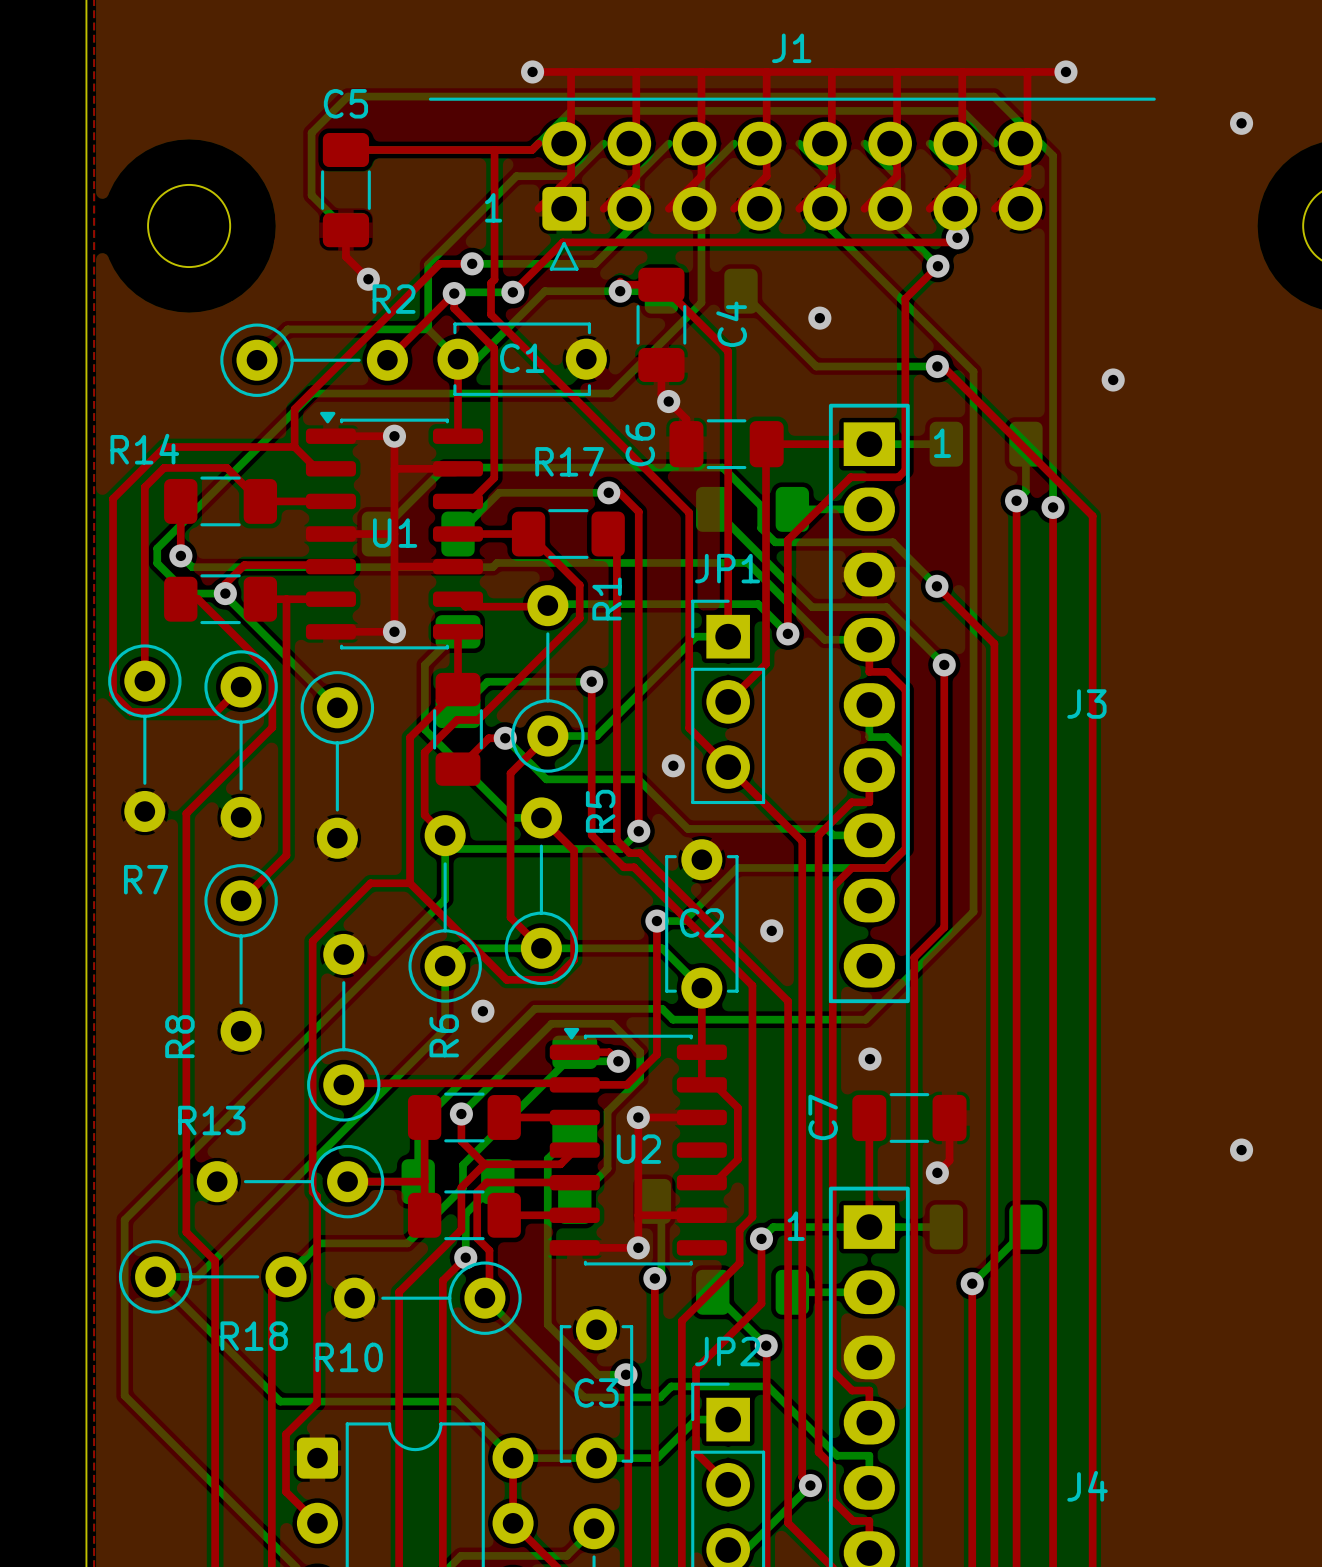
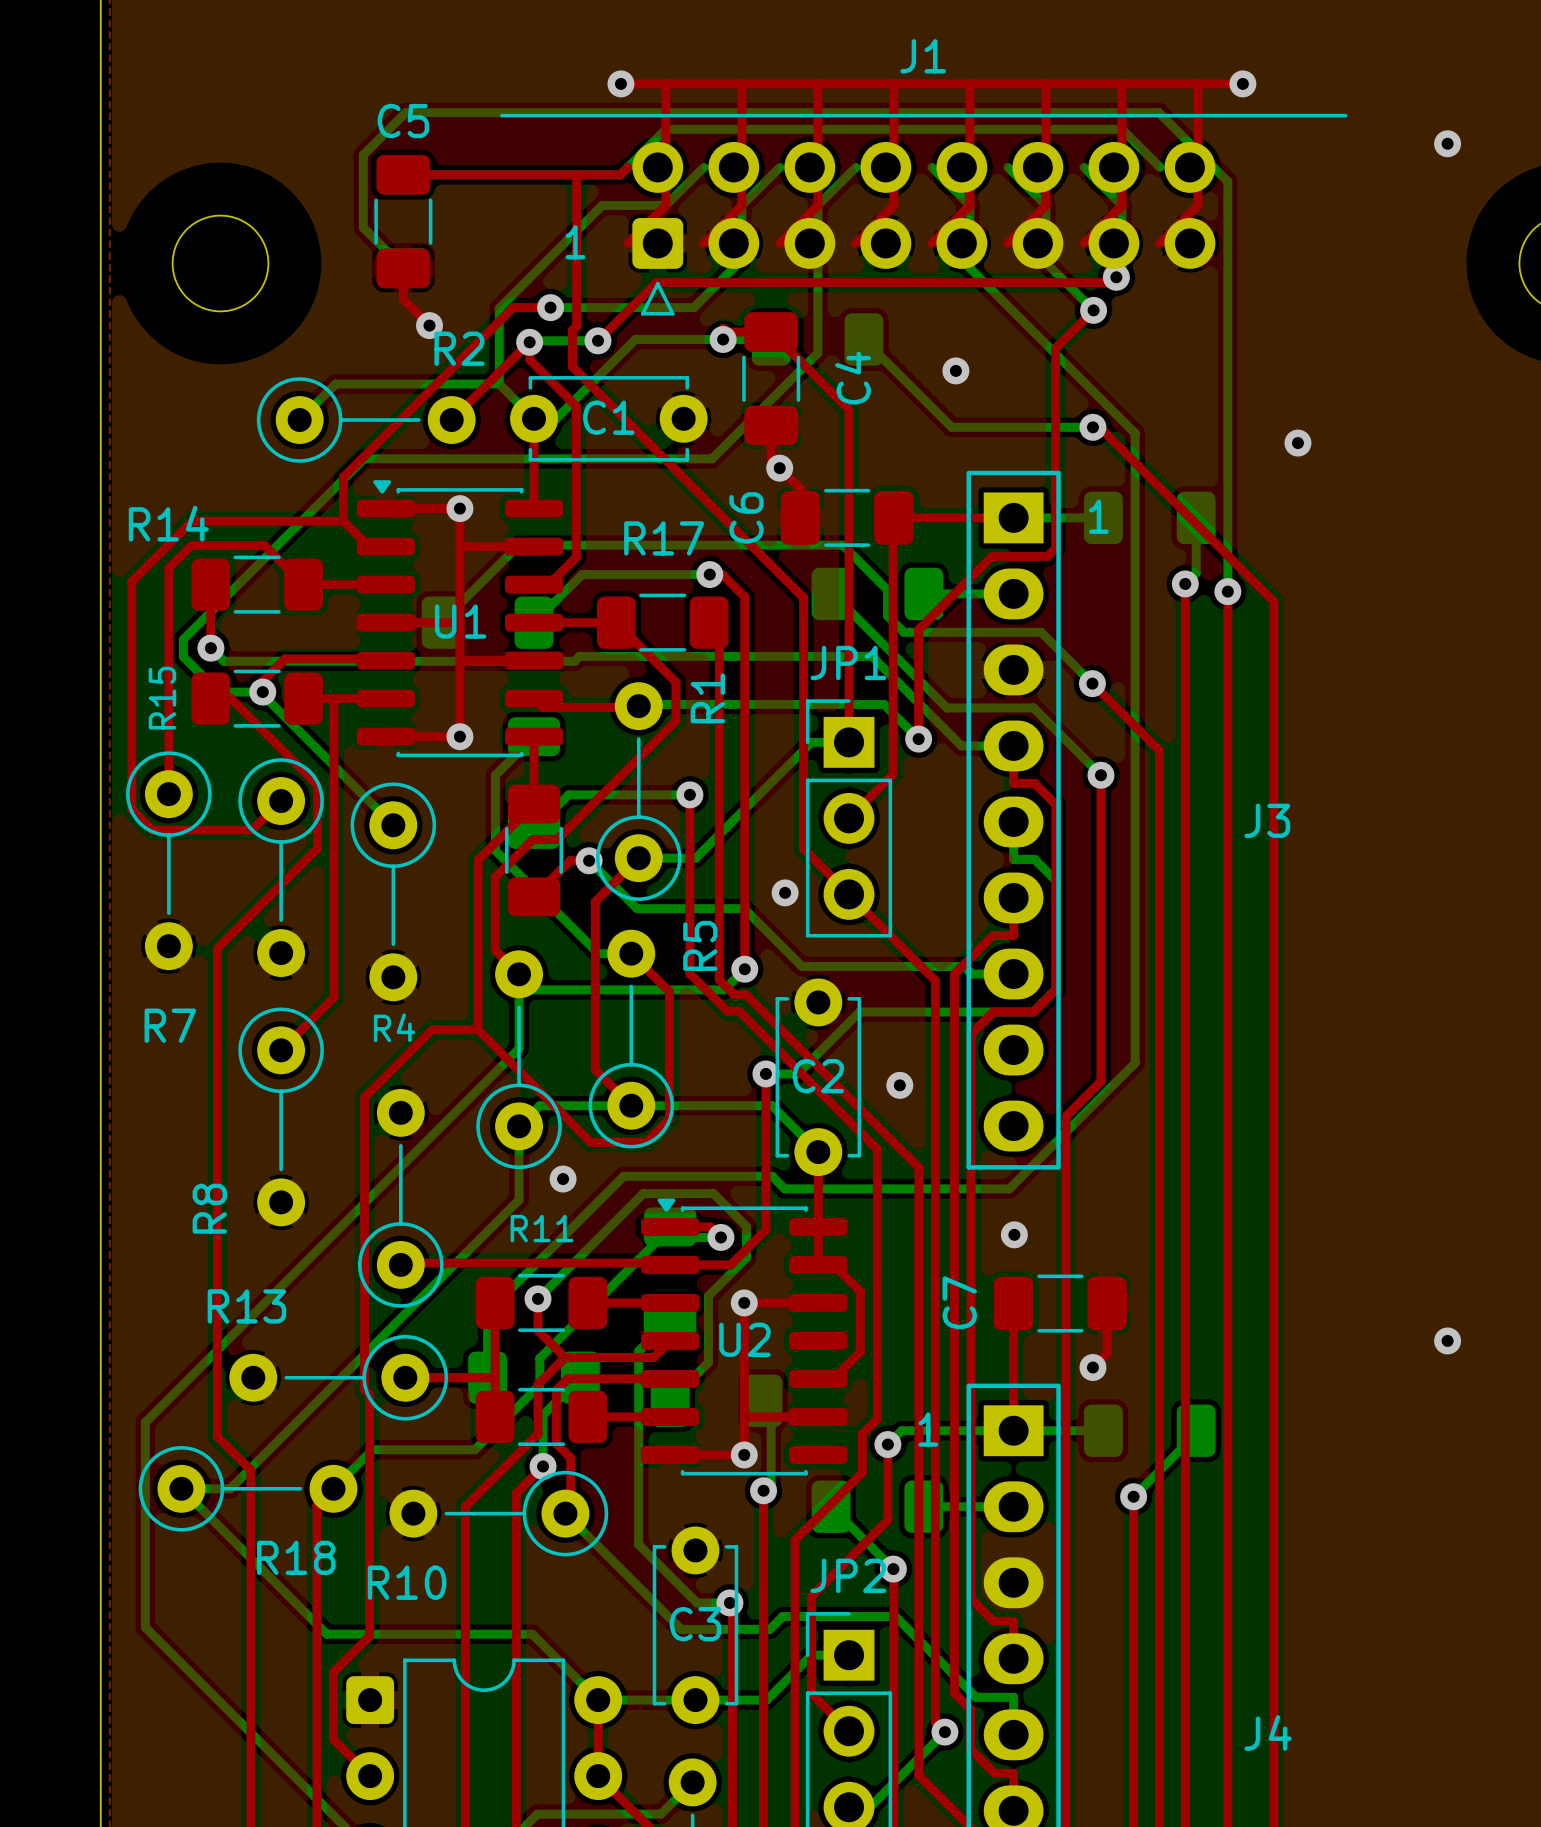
R15 name: none -> R15 (162, 698)
R4 name: none -> R4 (394, 1027)
R6 name: R6 (444, 1035) -> none
R11 name: none -> R11 (542, 1228)

